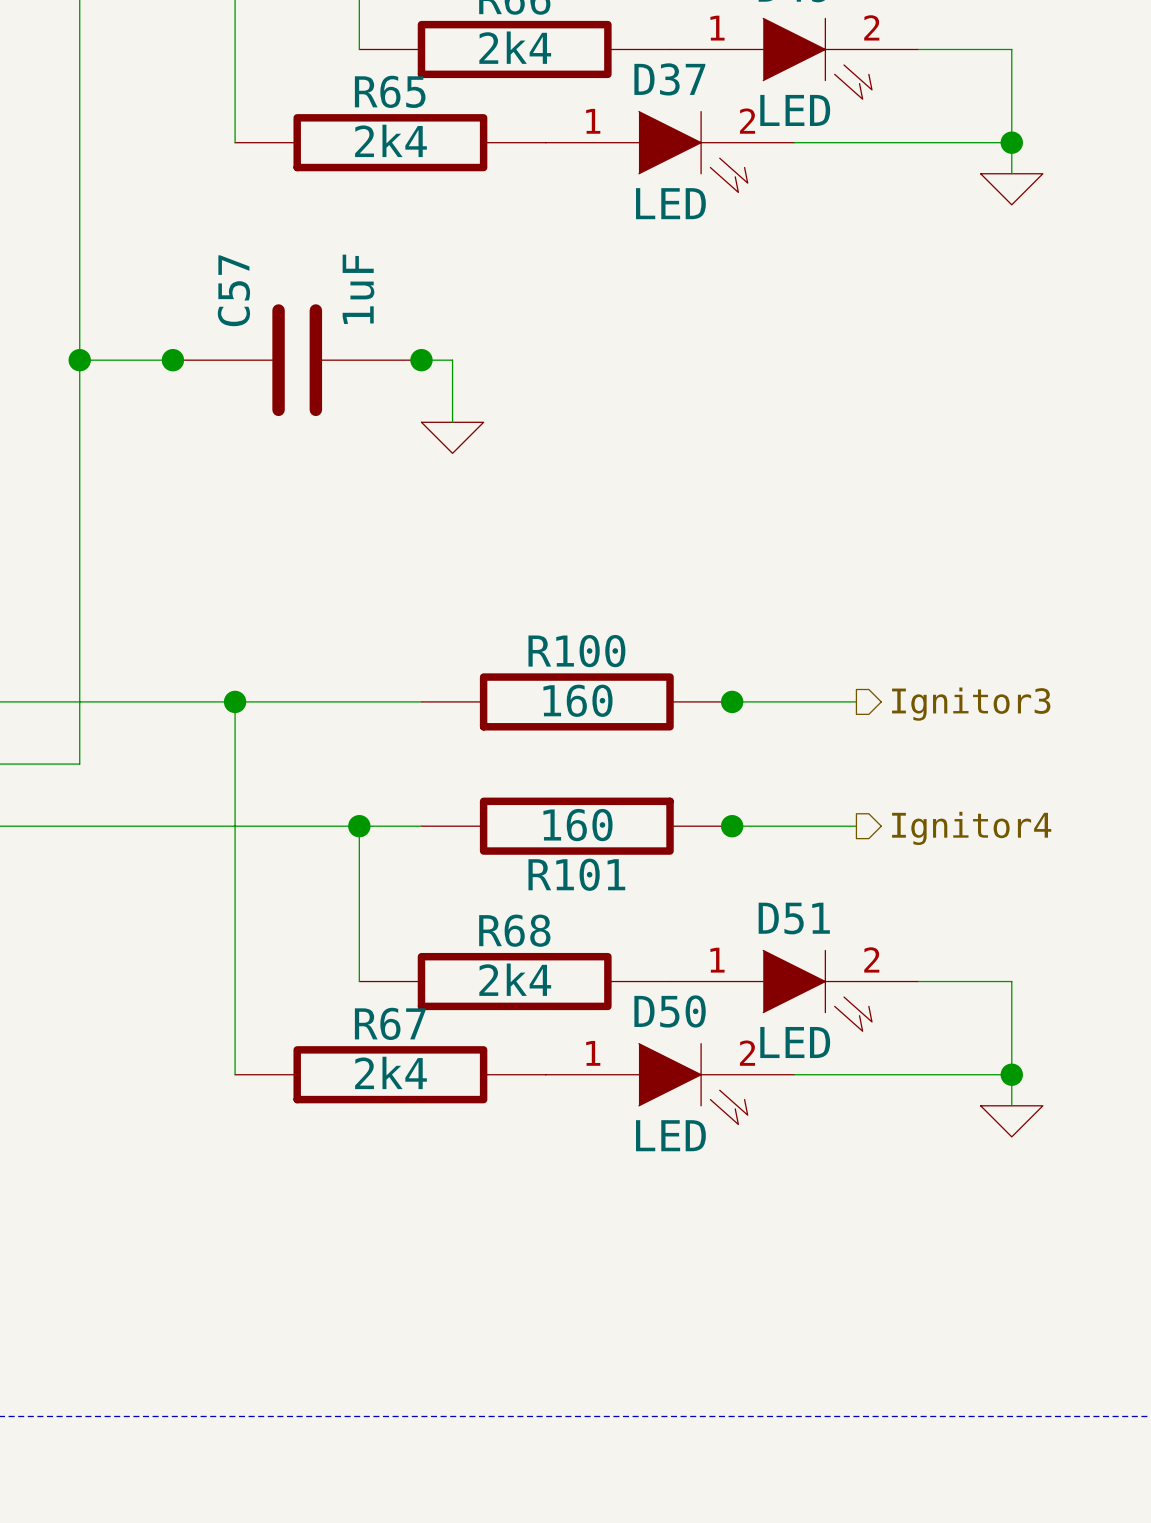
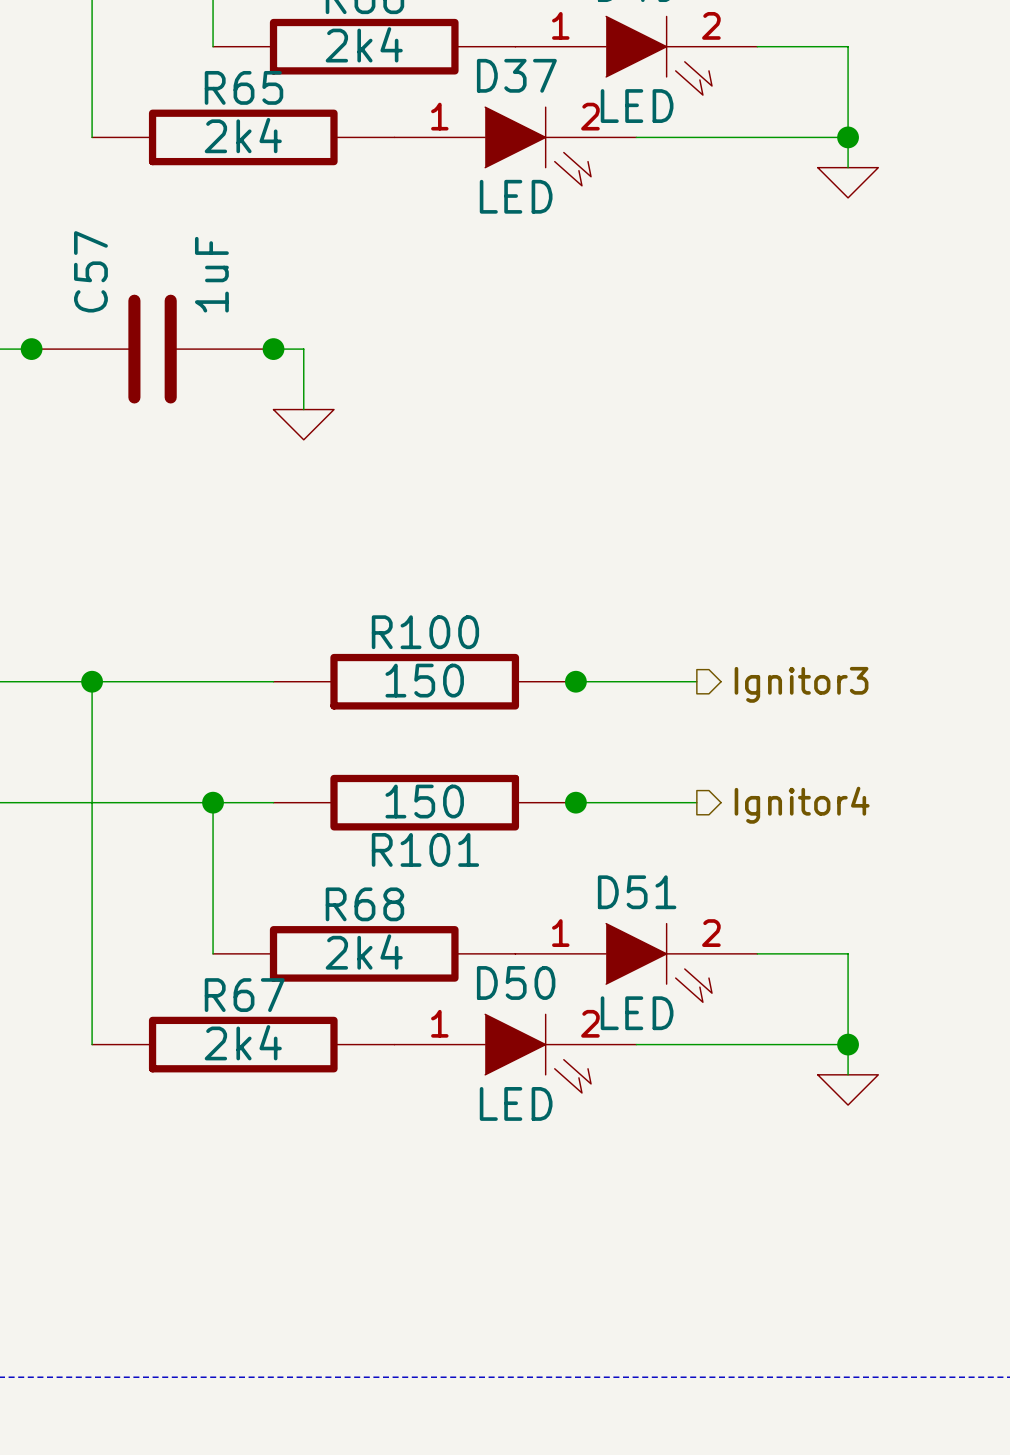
R100 value: 160 (577, 700) -> 150 (424, 680)
R101 value: 160 (577, 825) -> 150 (424, 801)

